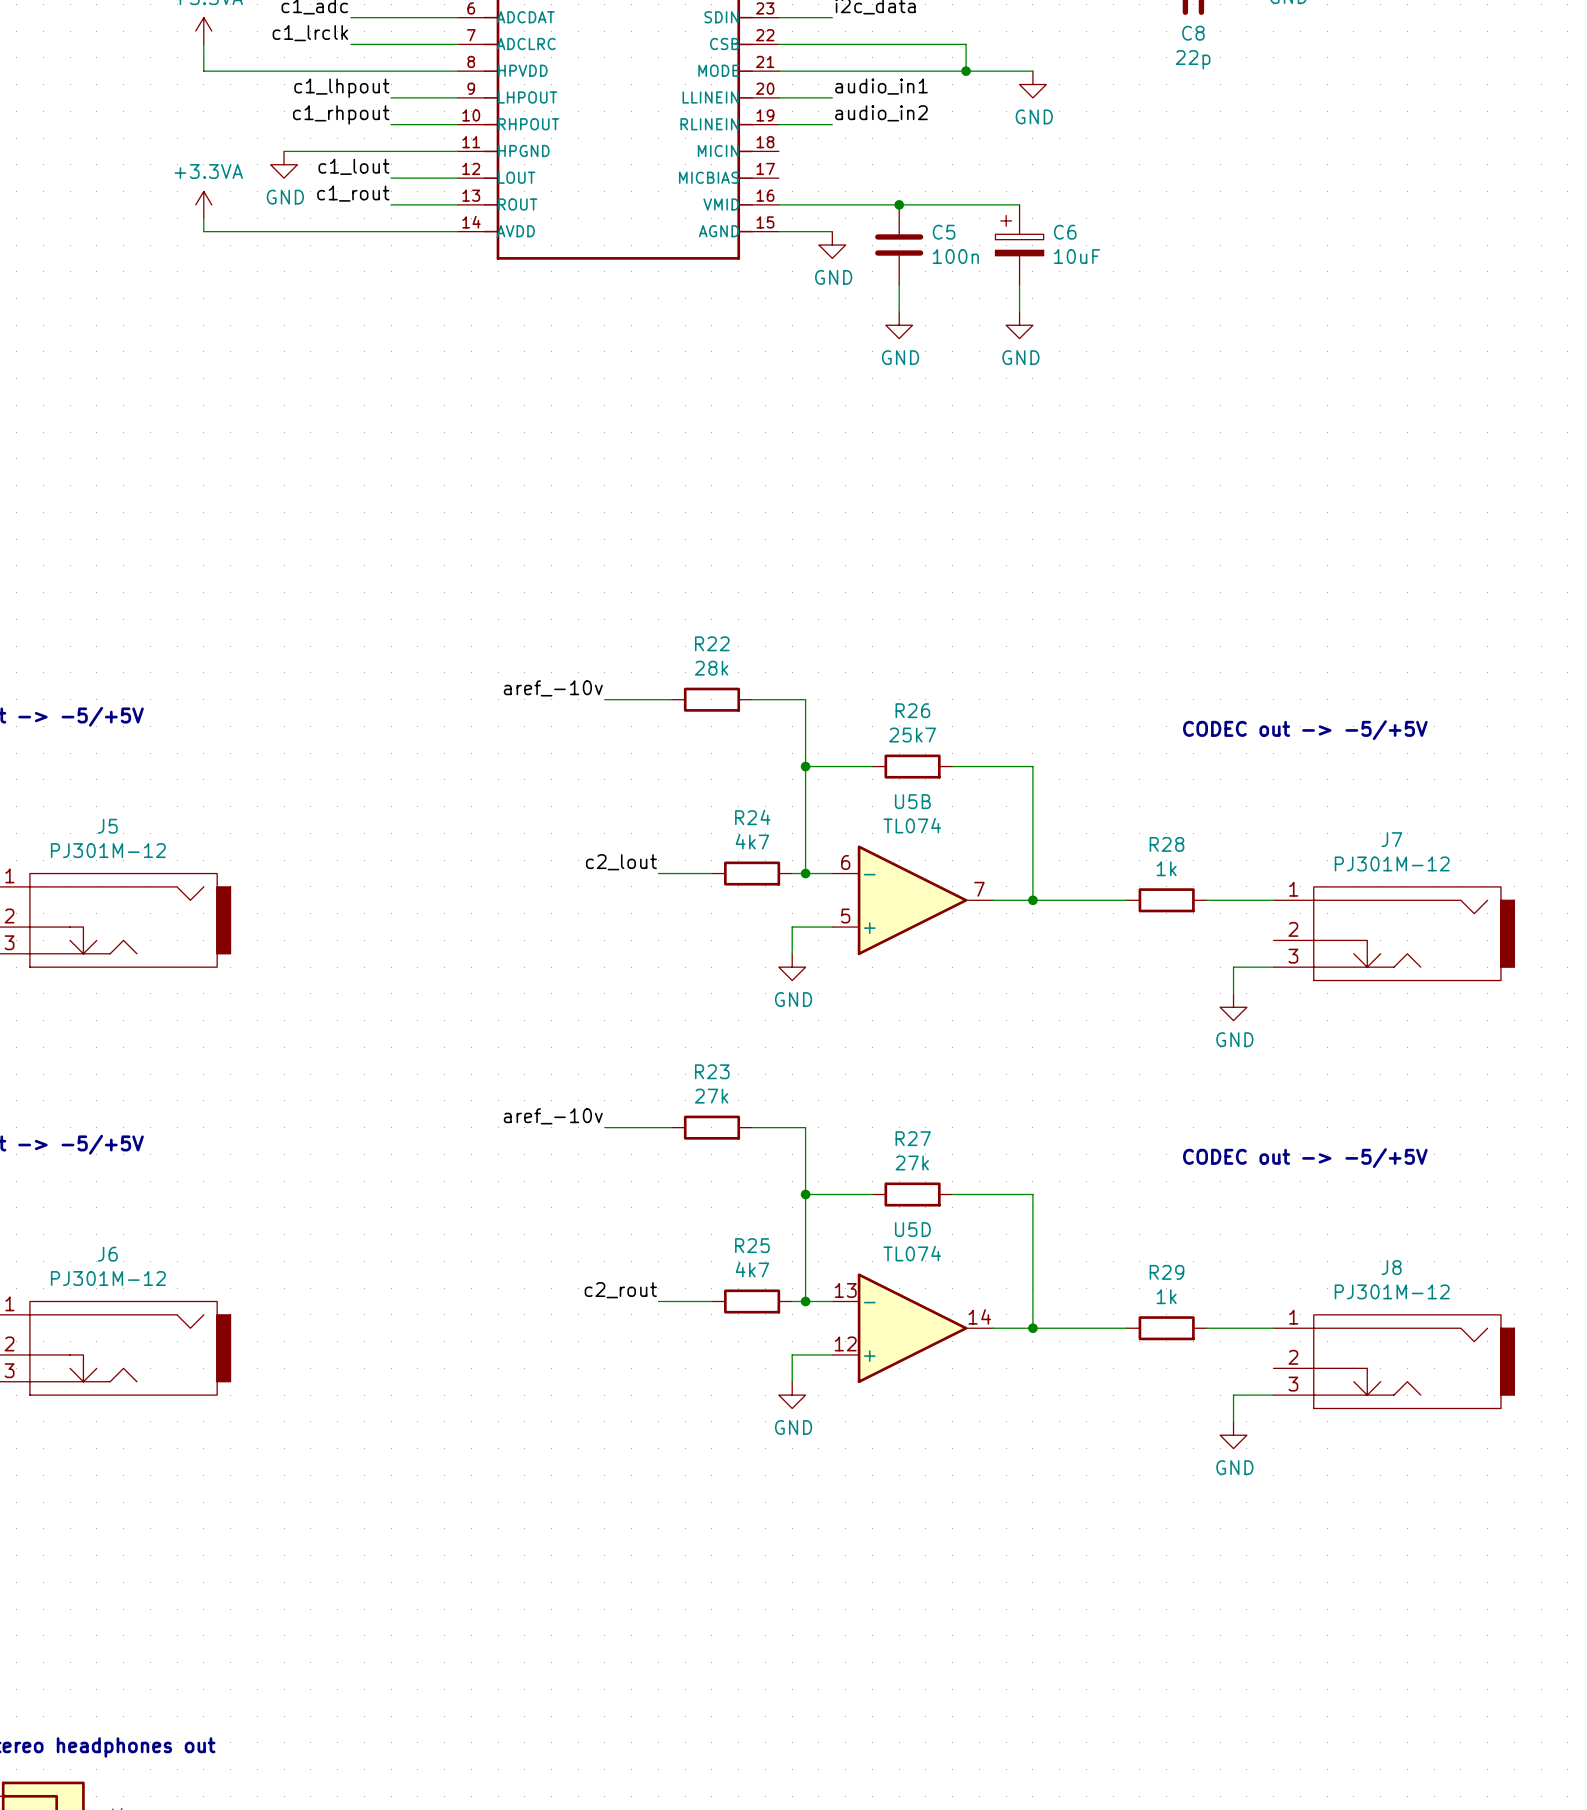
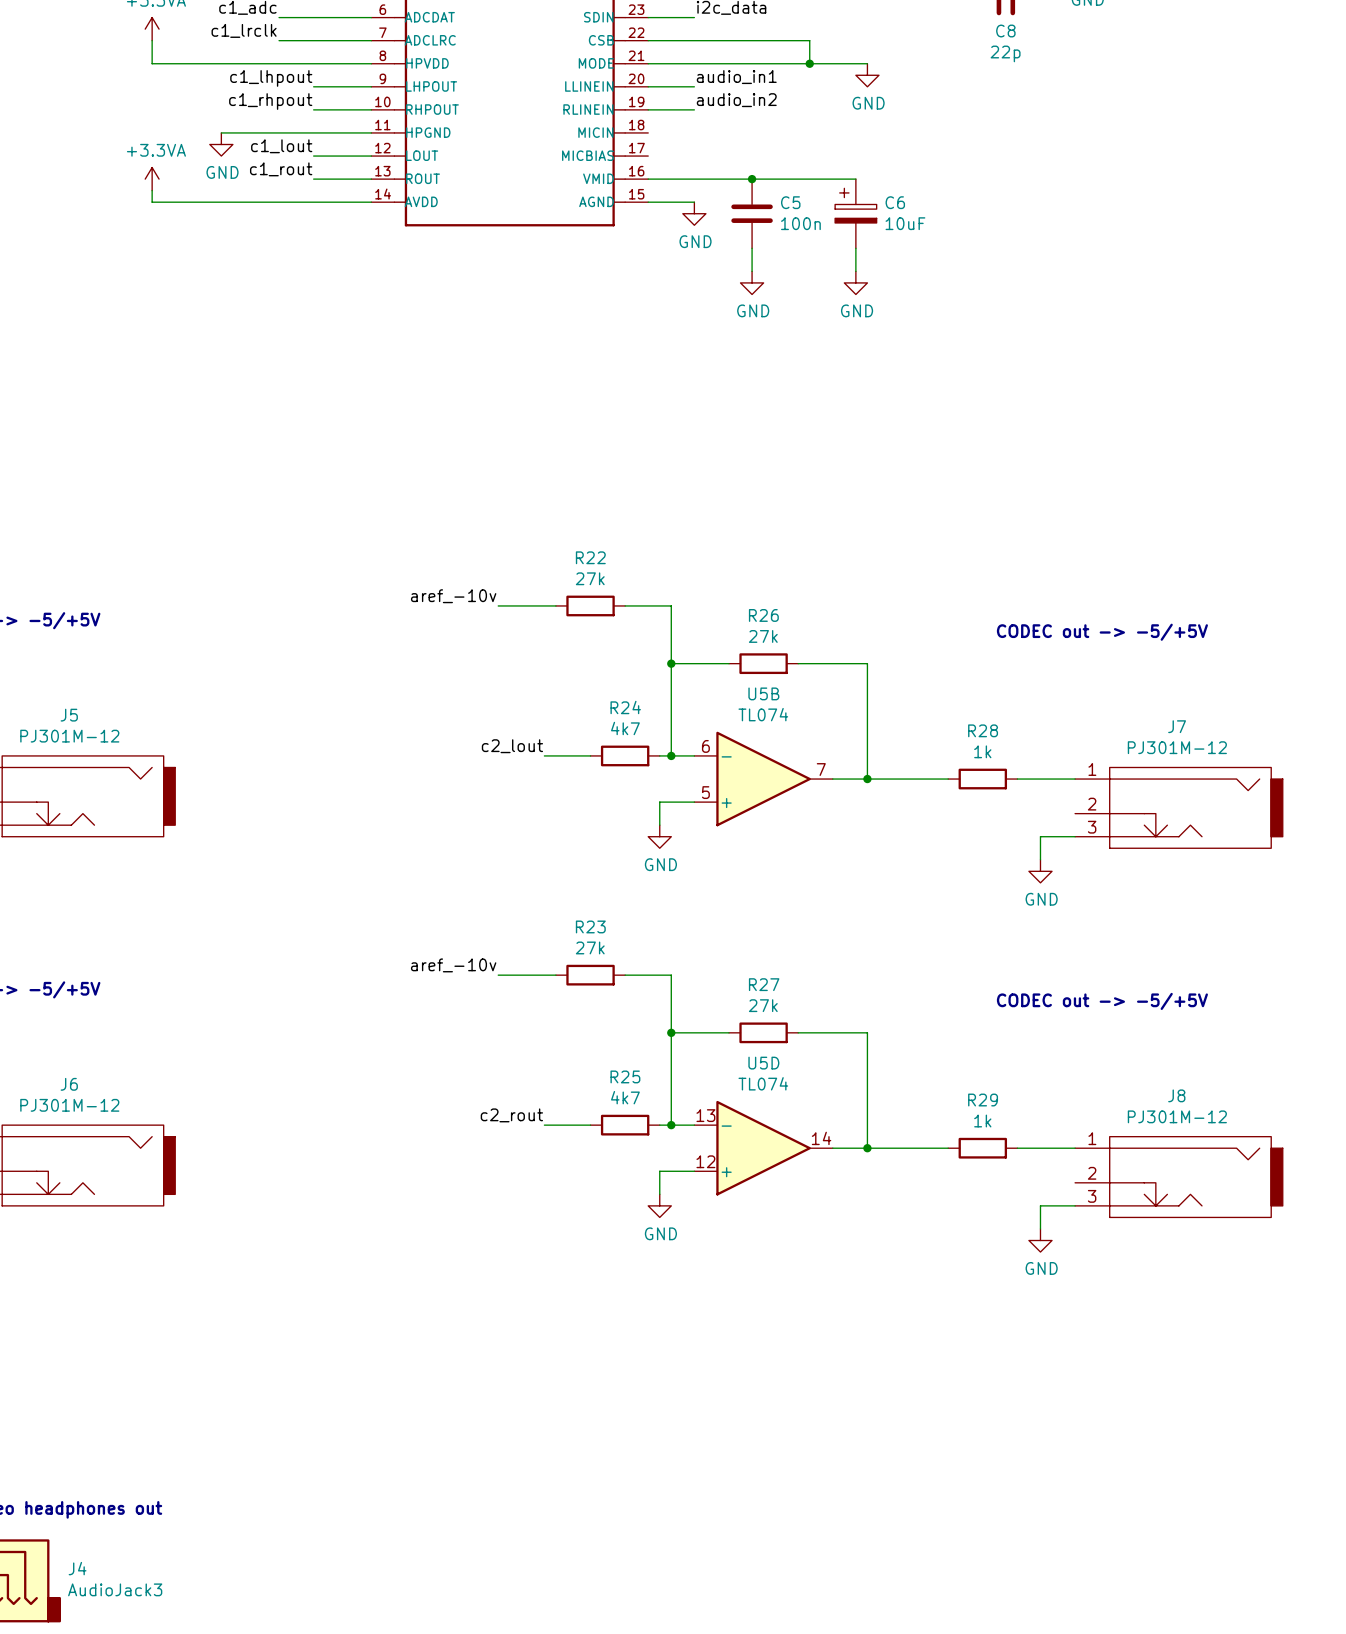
R22 value: 28k (711, 668) -> 27k (590, 578)
R26 value: 25k7 (912, 735) -> 27k (763, 636)

